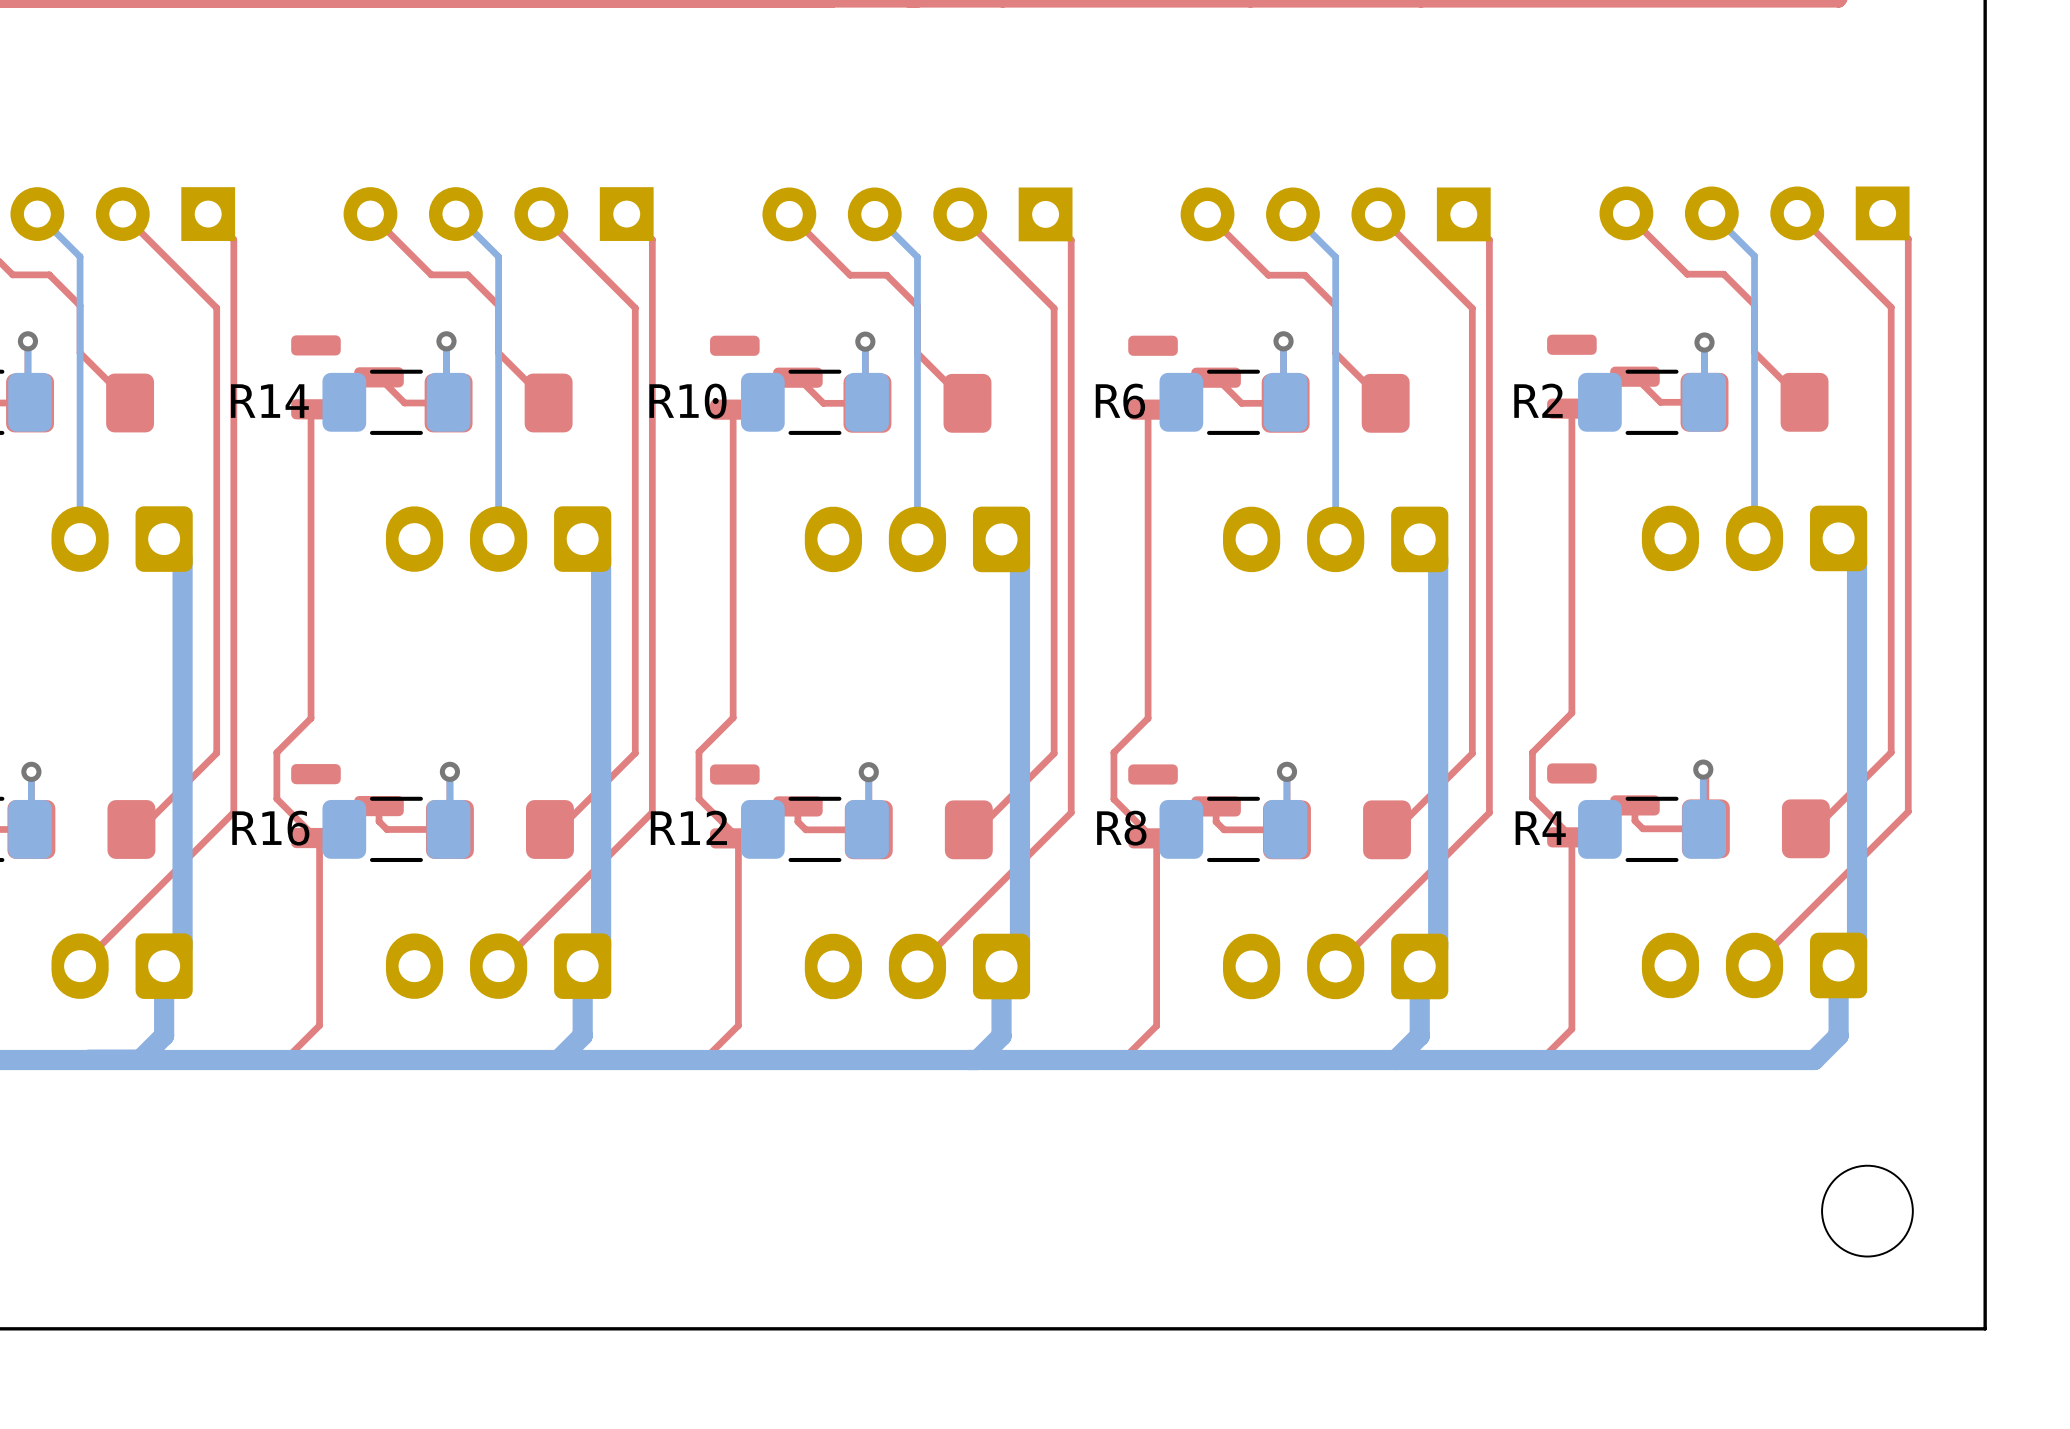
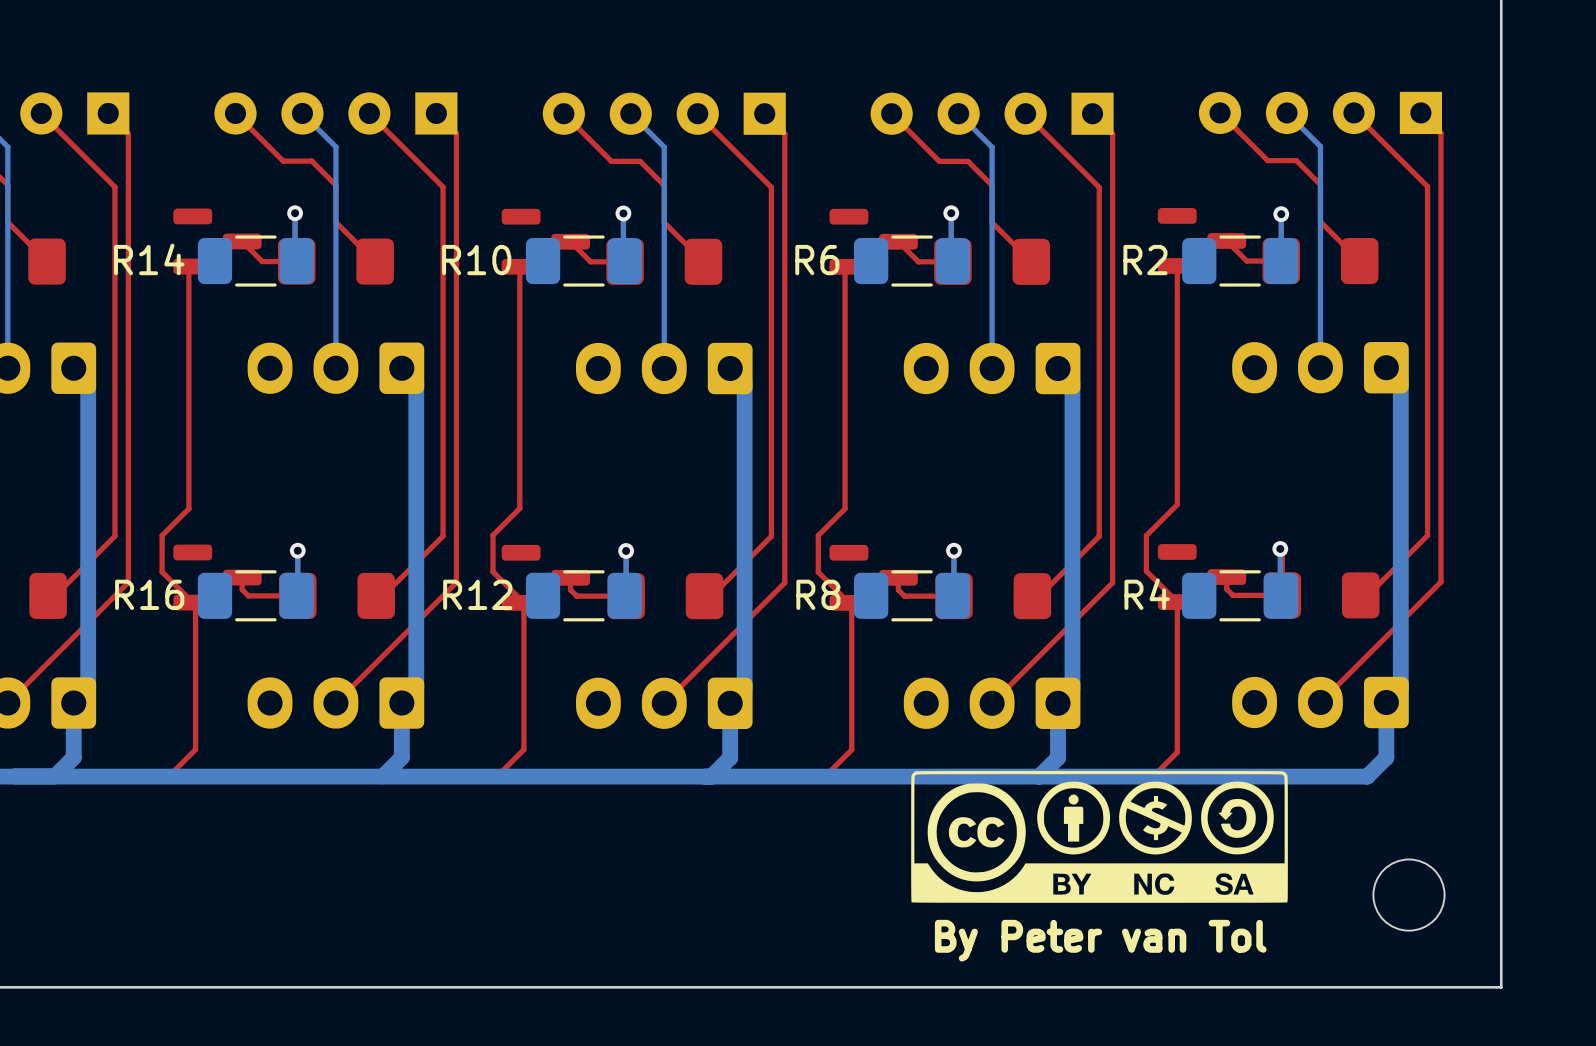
drawing: none -> [911, 770, 1288, 903]
text: none -> By Peter van Tol (1100, 940)

